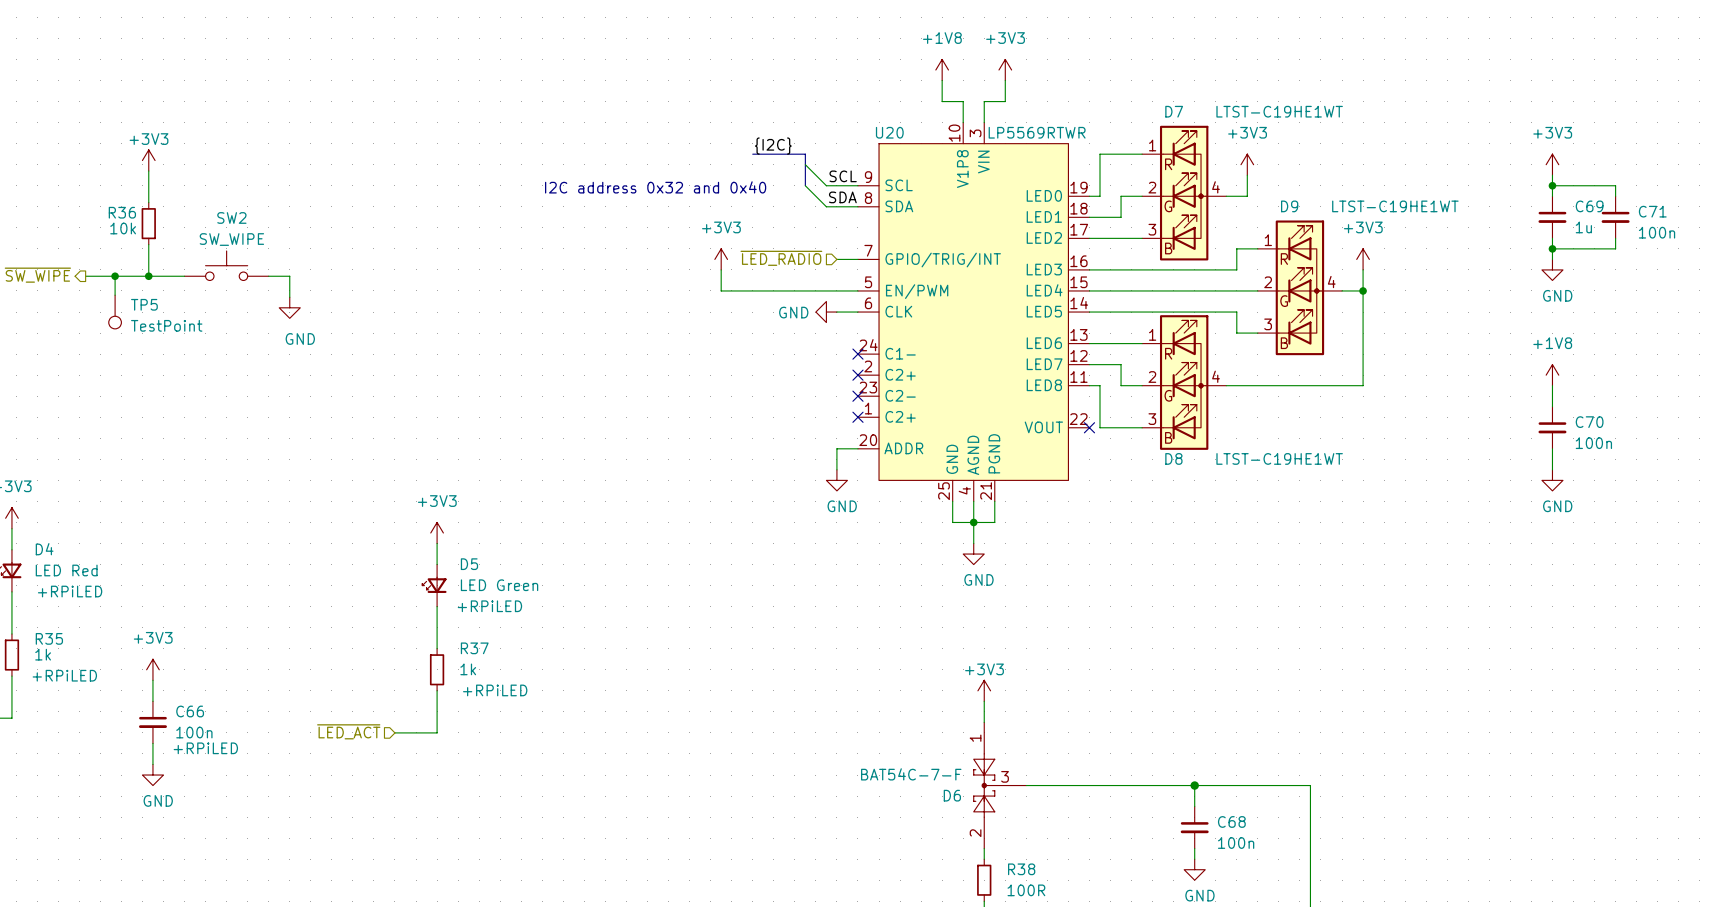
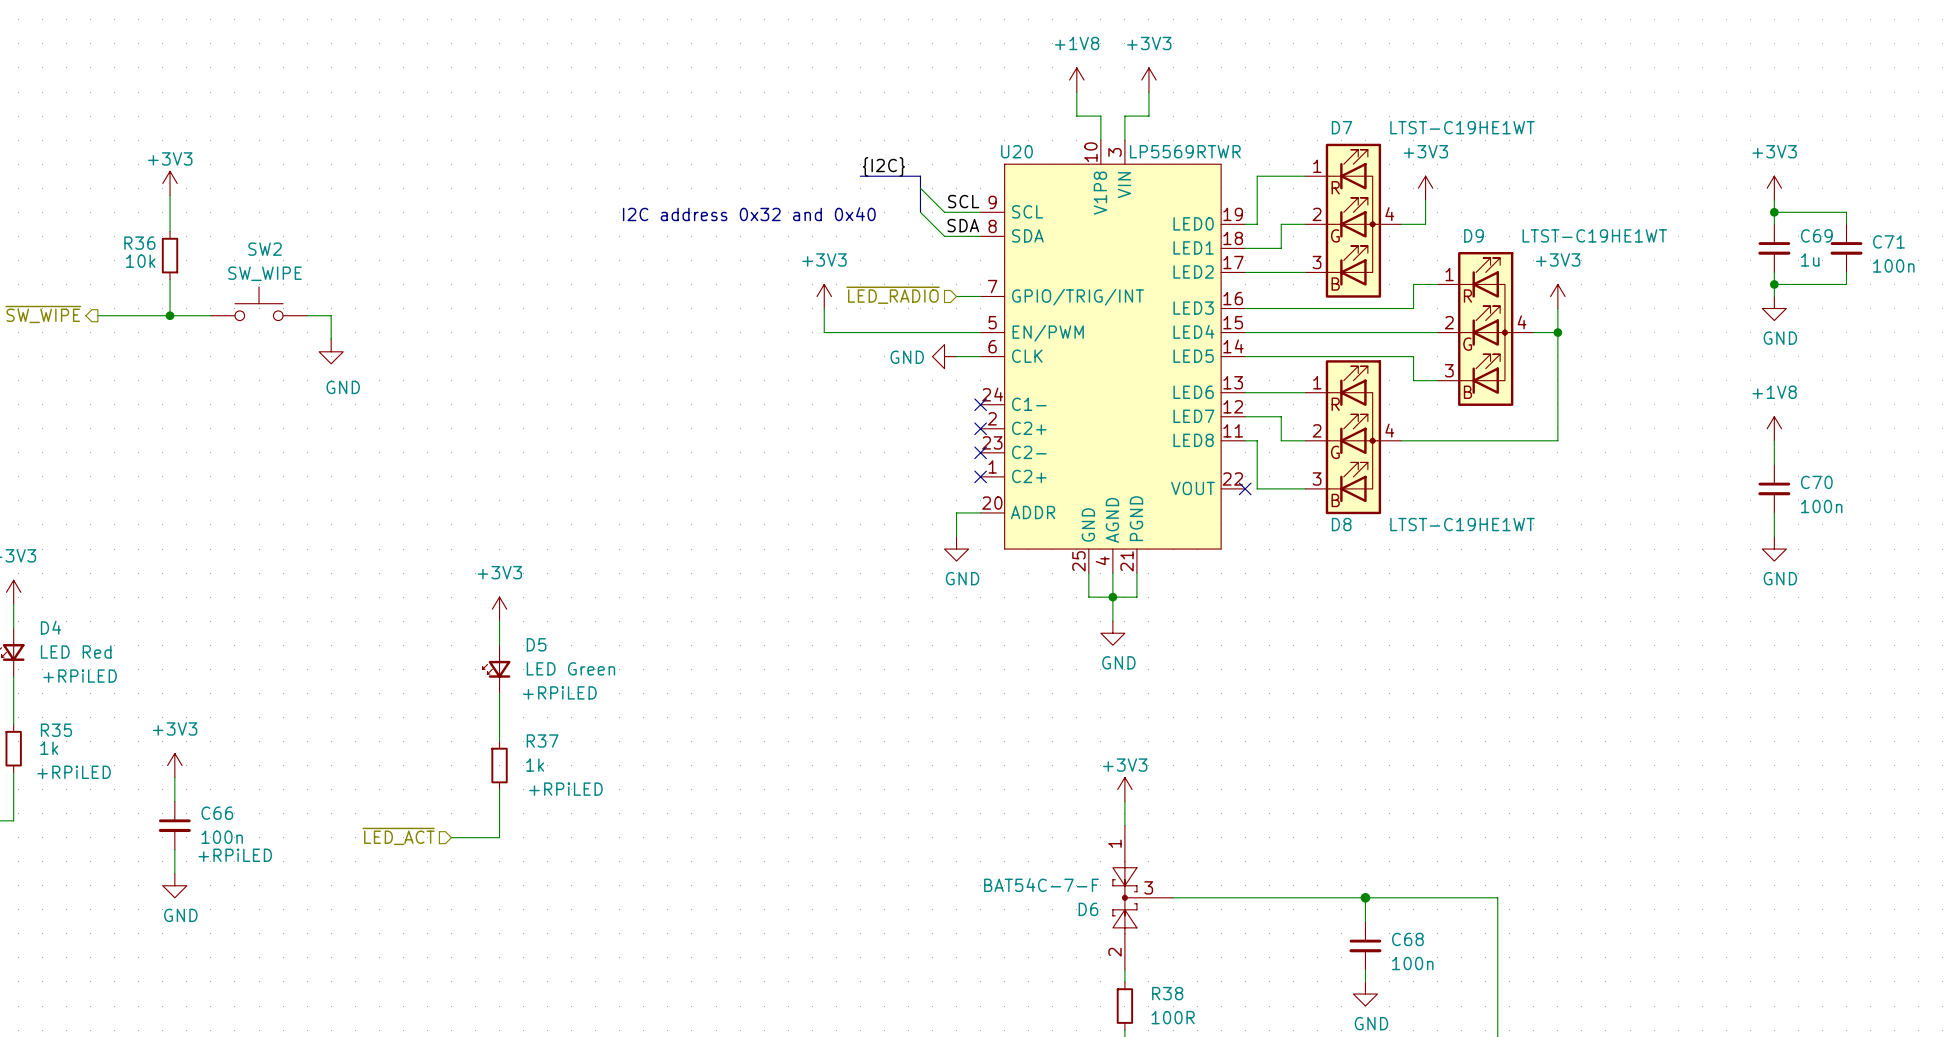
wire: (115, 276) (115, 295) -> none
junction: (115, 276) -> none
TP5: TestPoint (115, 312) -> none

